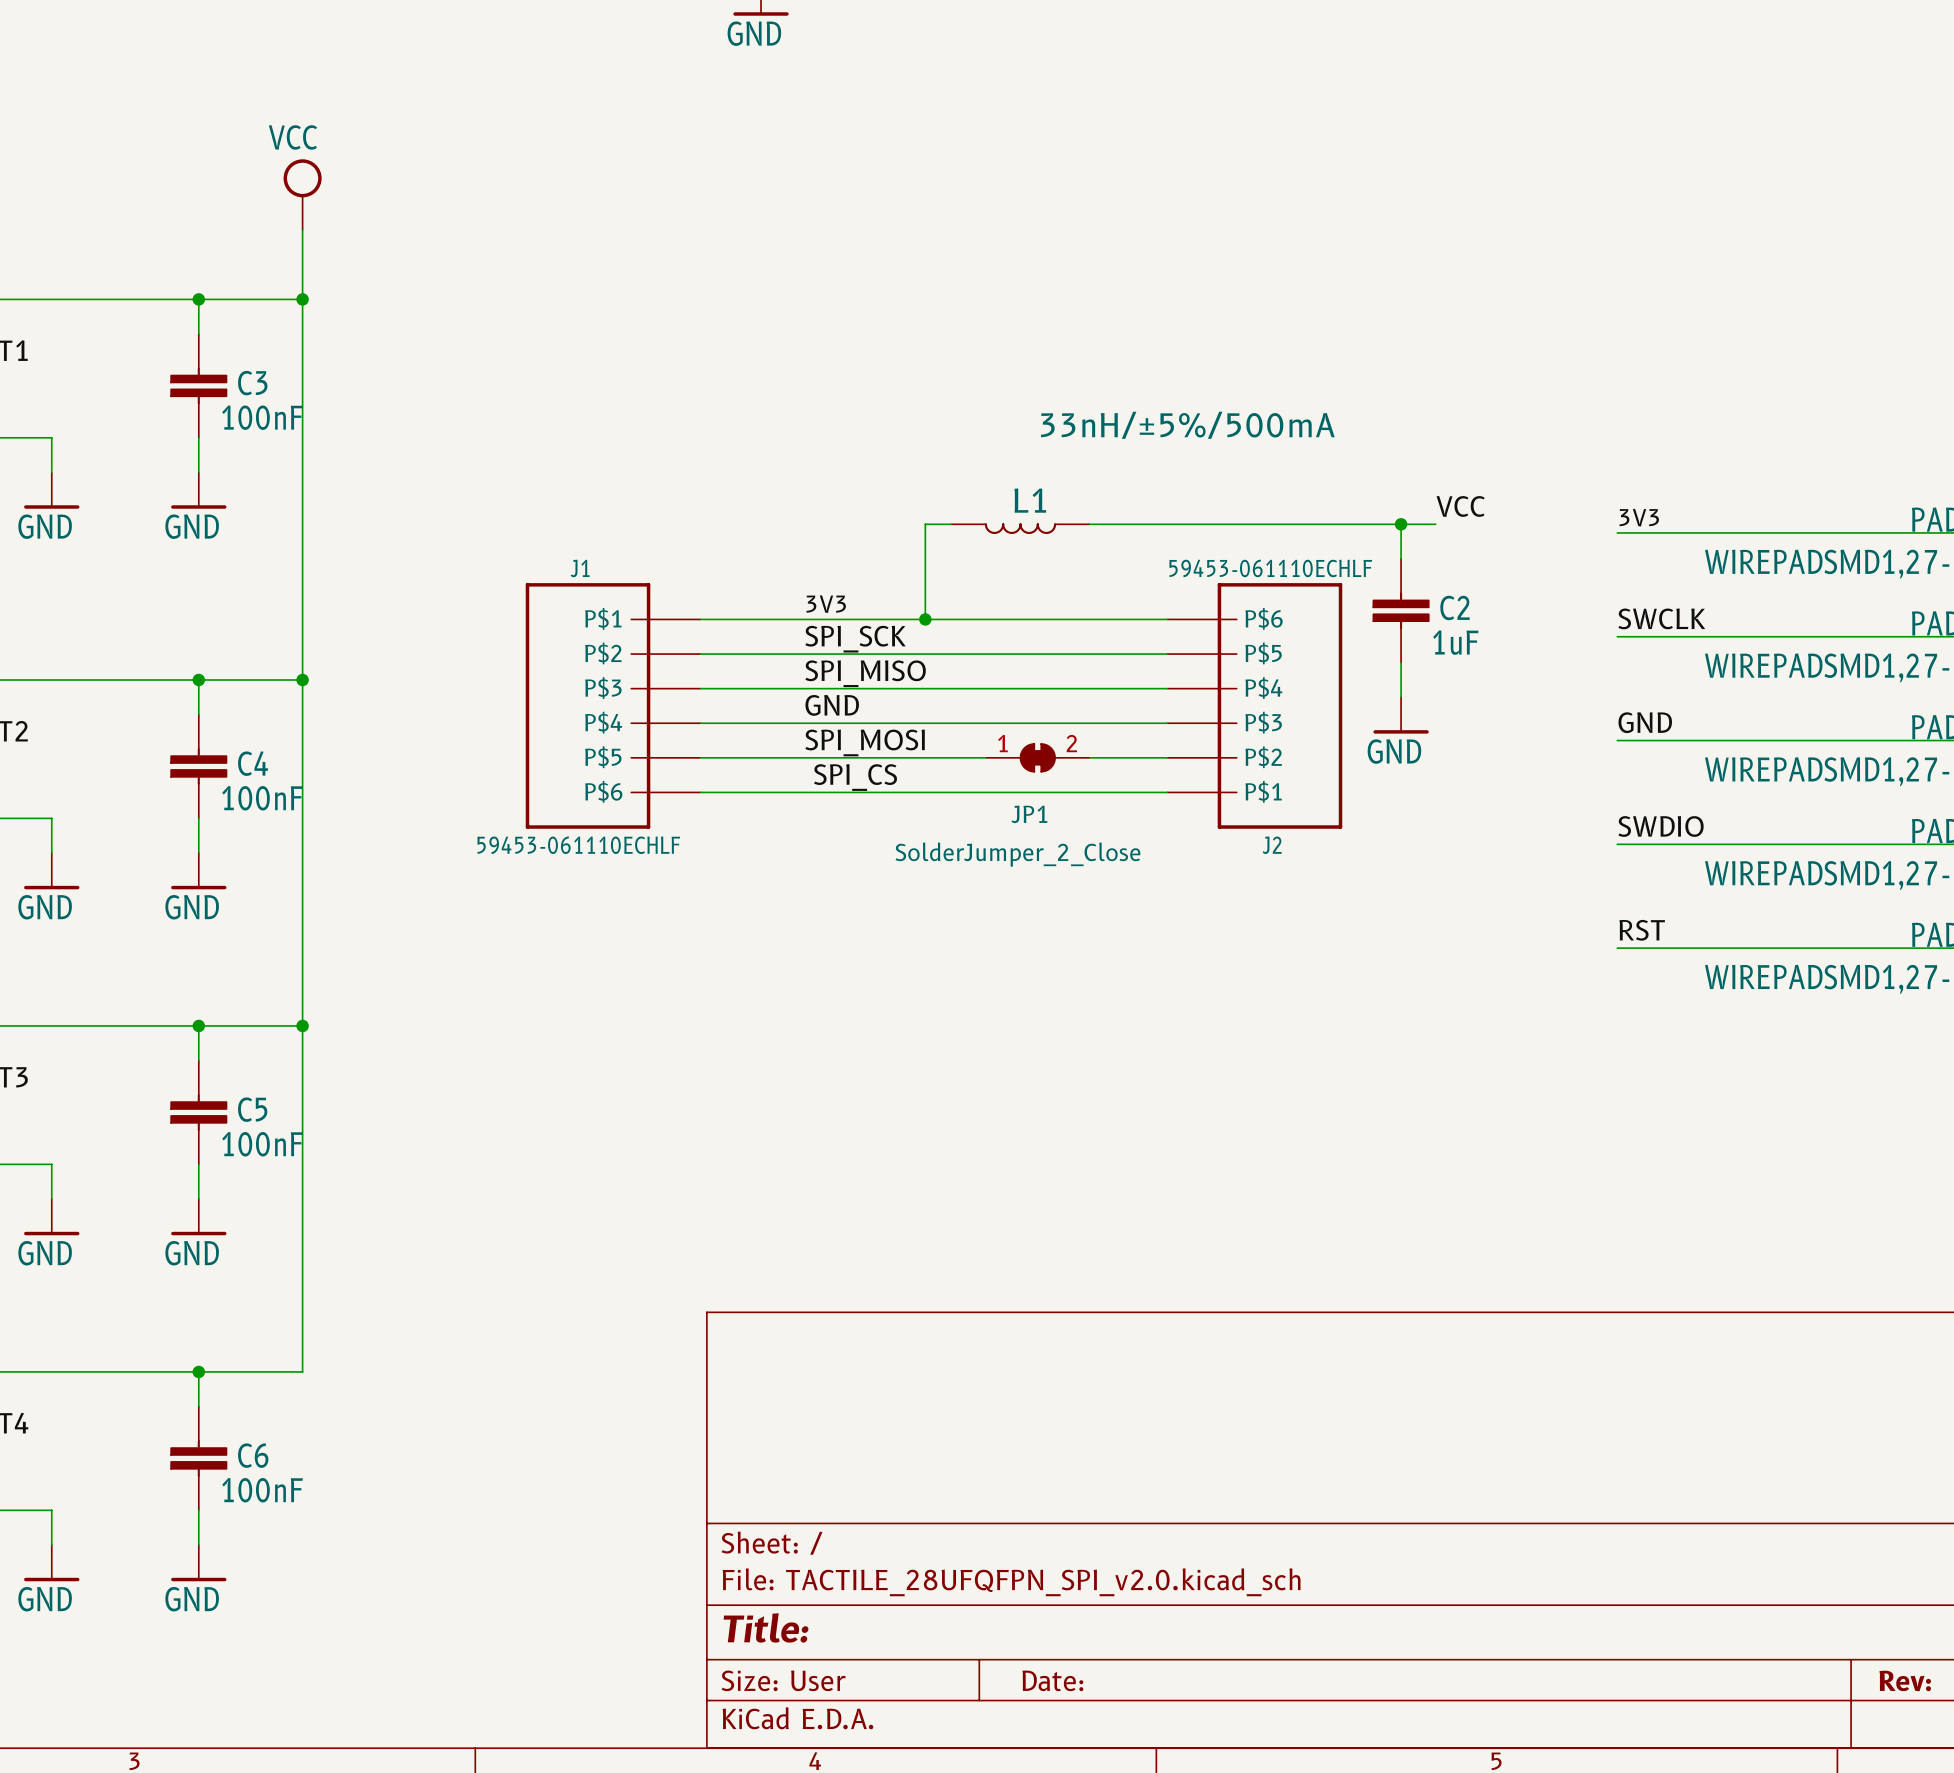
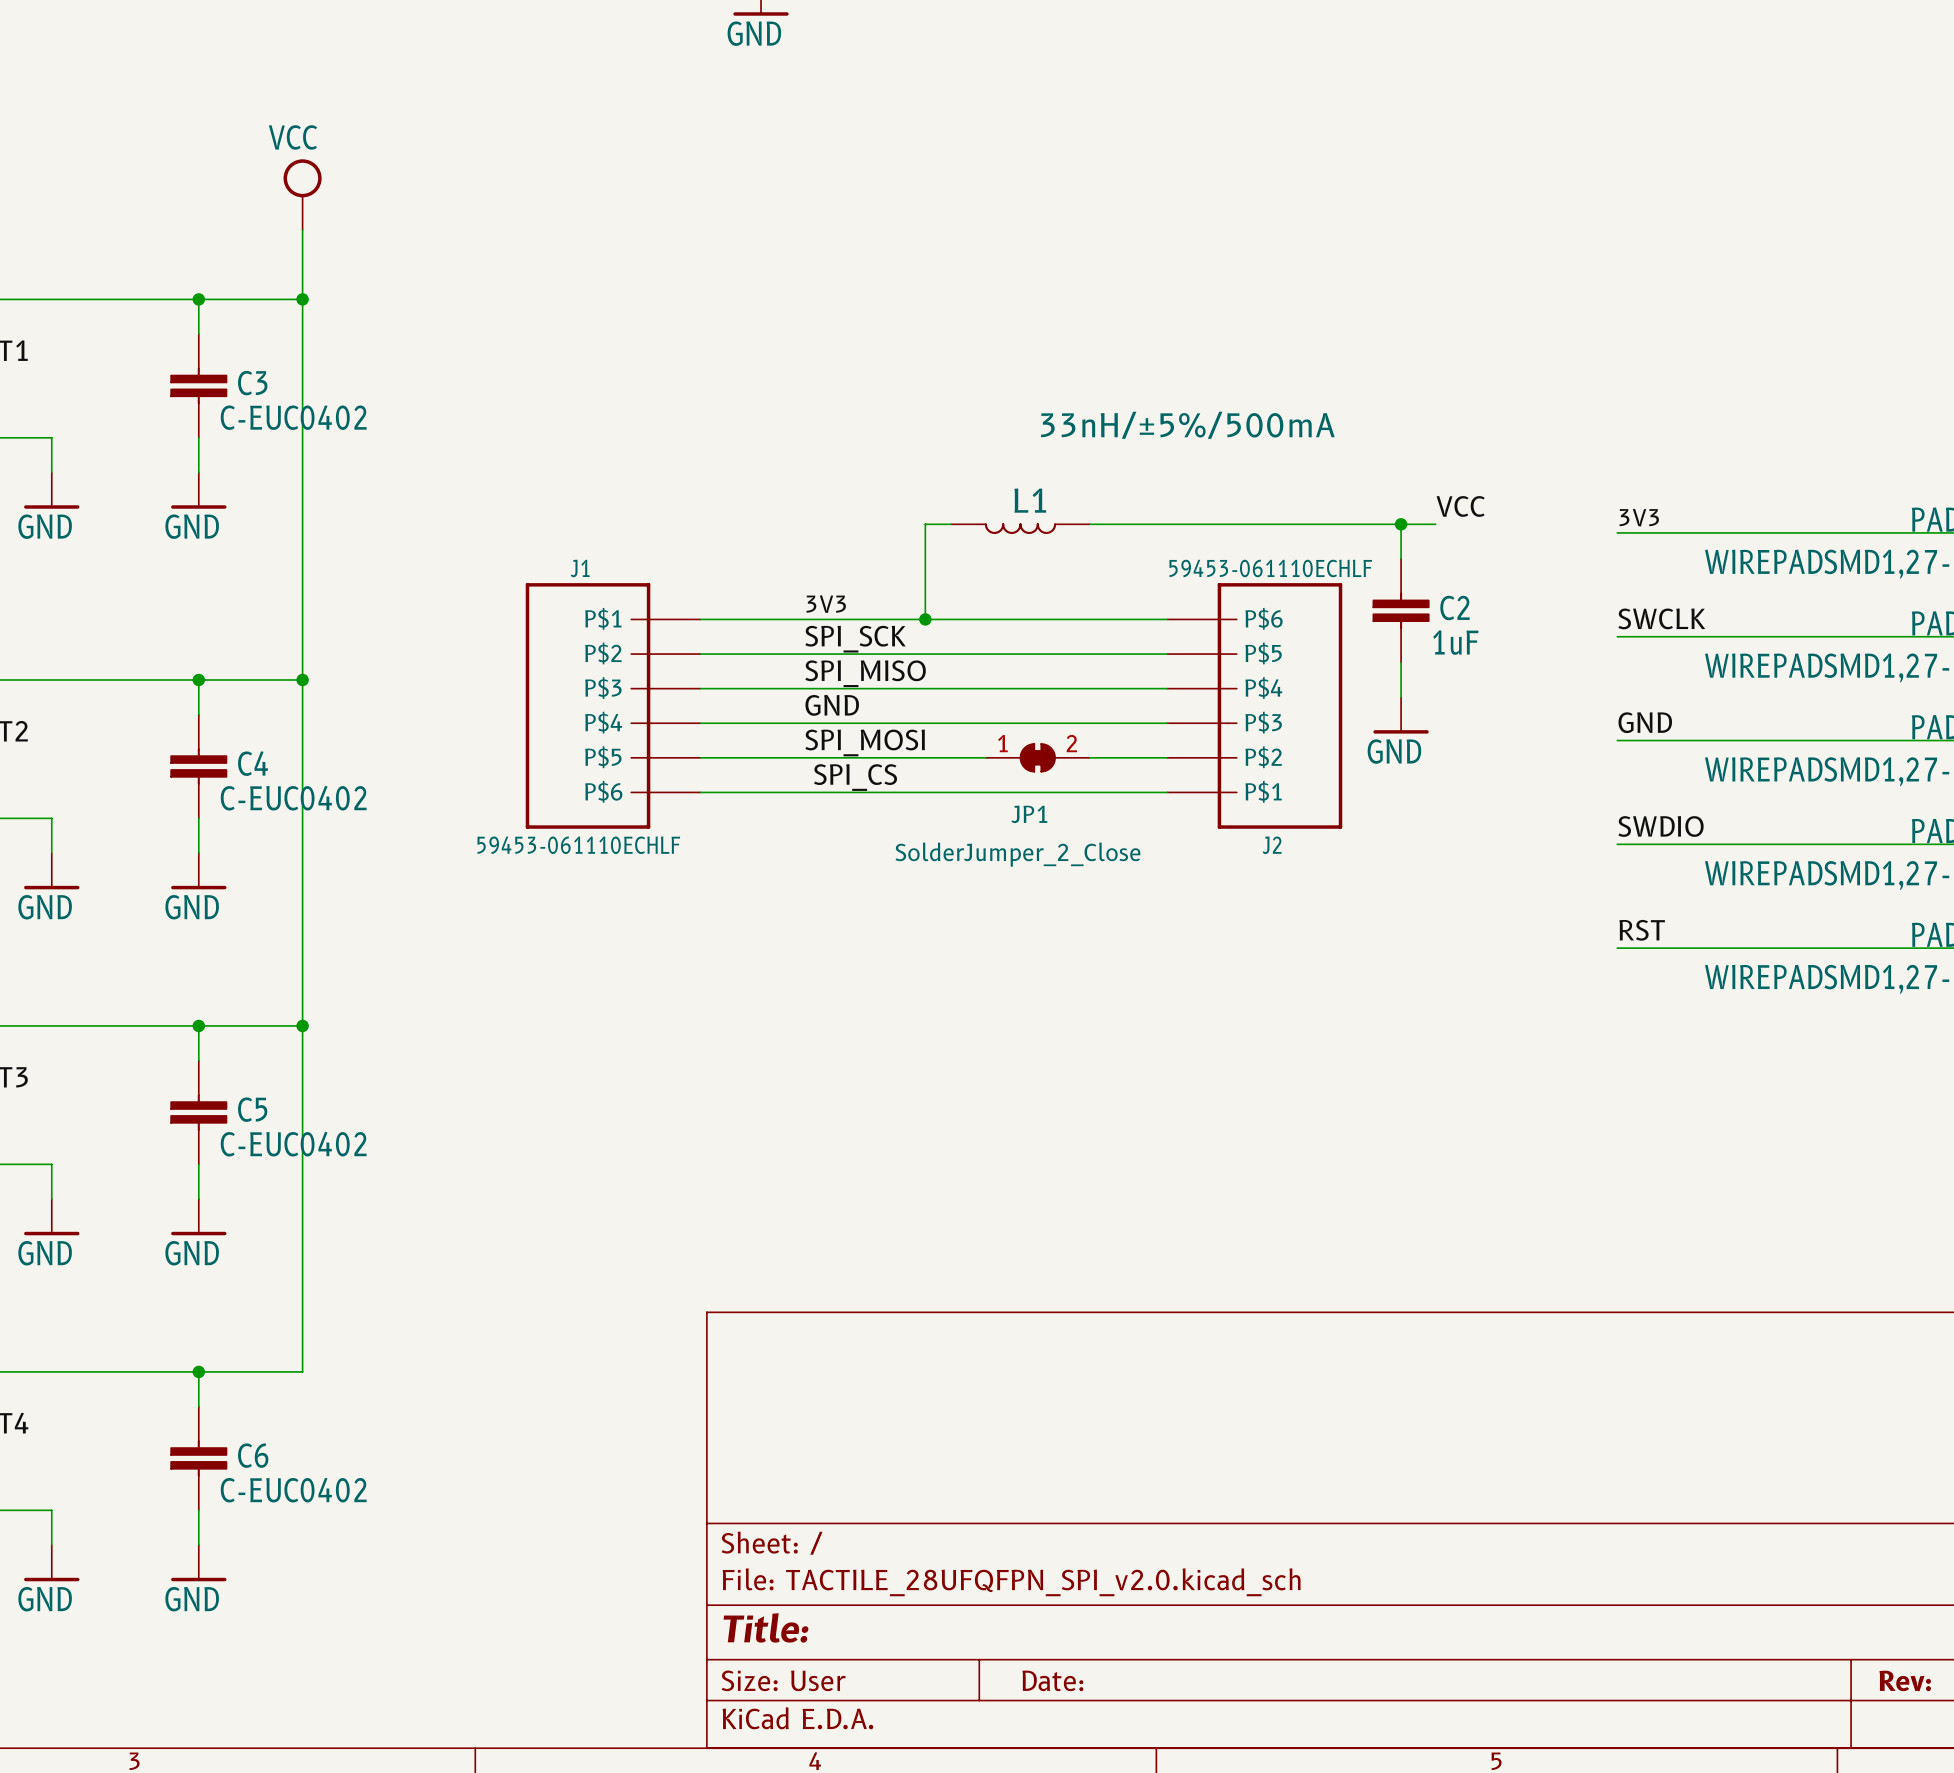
C3 value: 100nF (262, 417) -> C-EUC0402 (293, 417)
C4 value: 100nF (262, 798) -> C-EUC0402 (293, 798)
C5 value: 100nF (262, 1144) -> C-EUC0402 (293, 1144)
C6 value: 100nF (262, 1490) -> C-EUC0402 (293, 1490)

